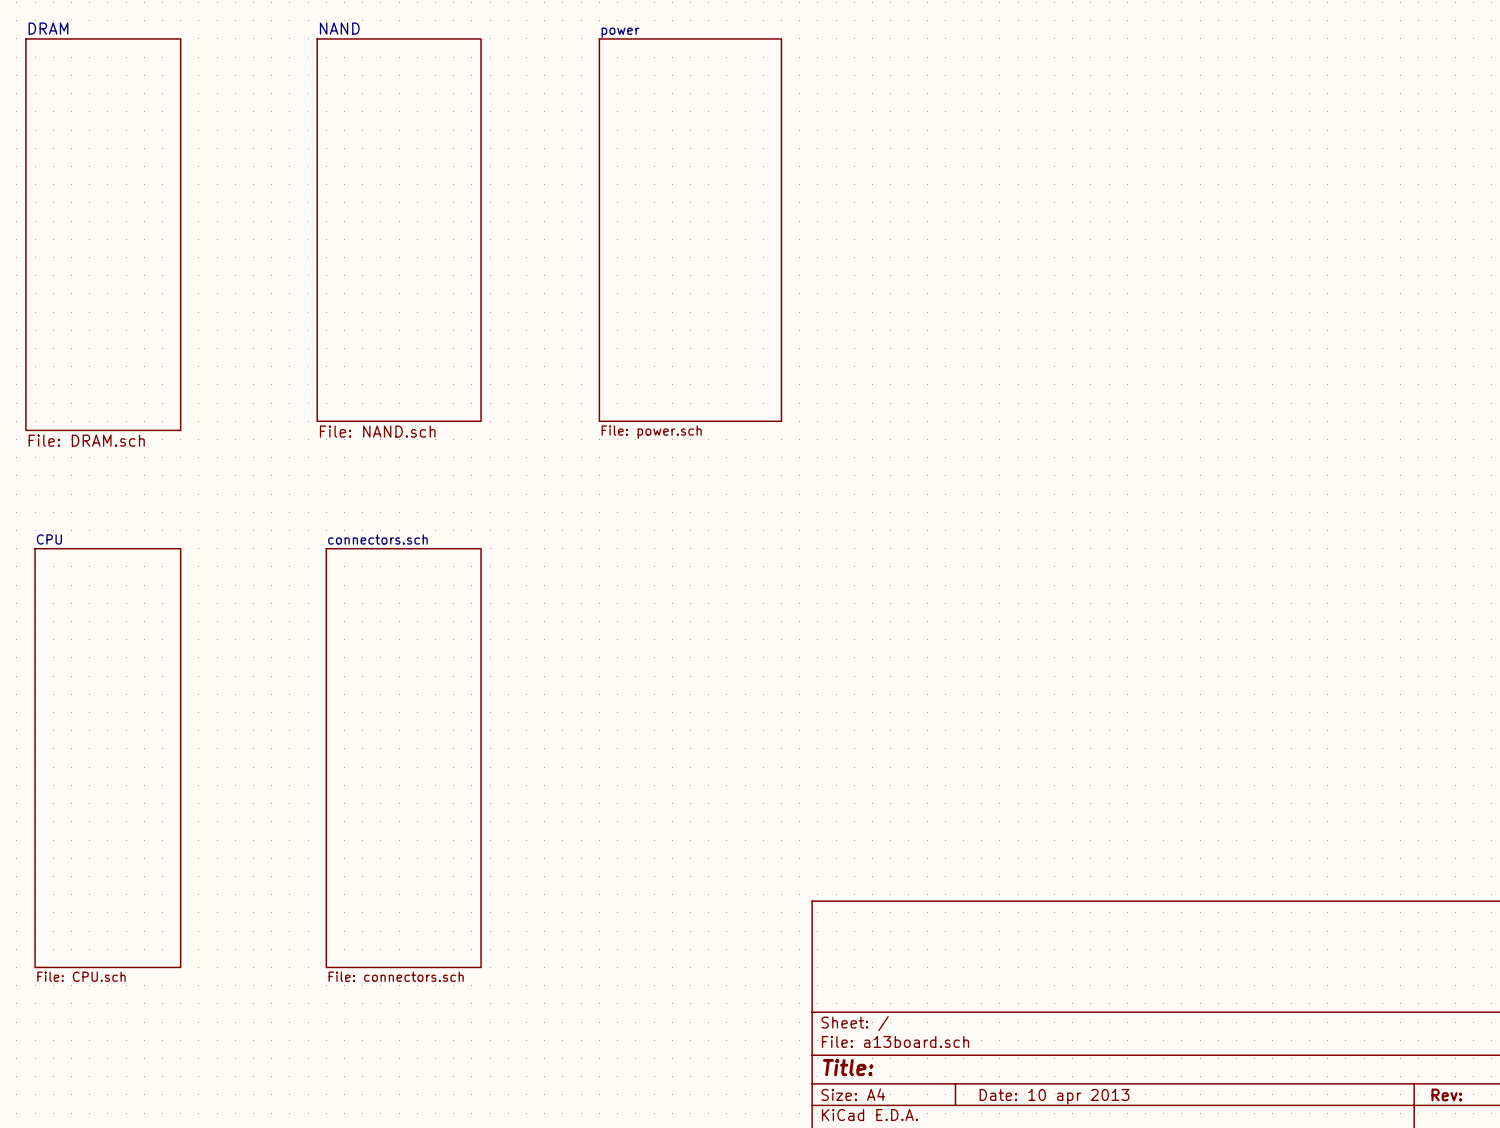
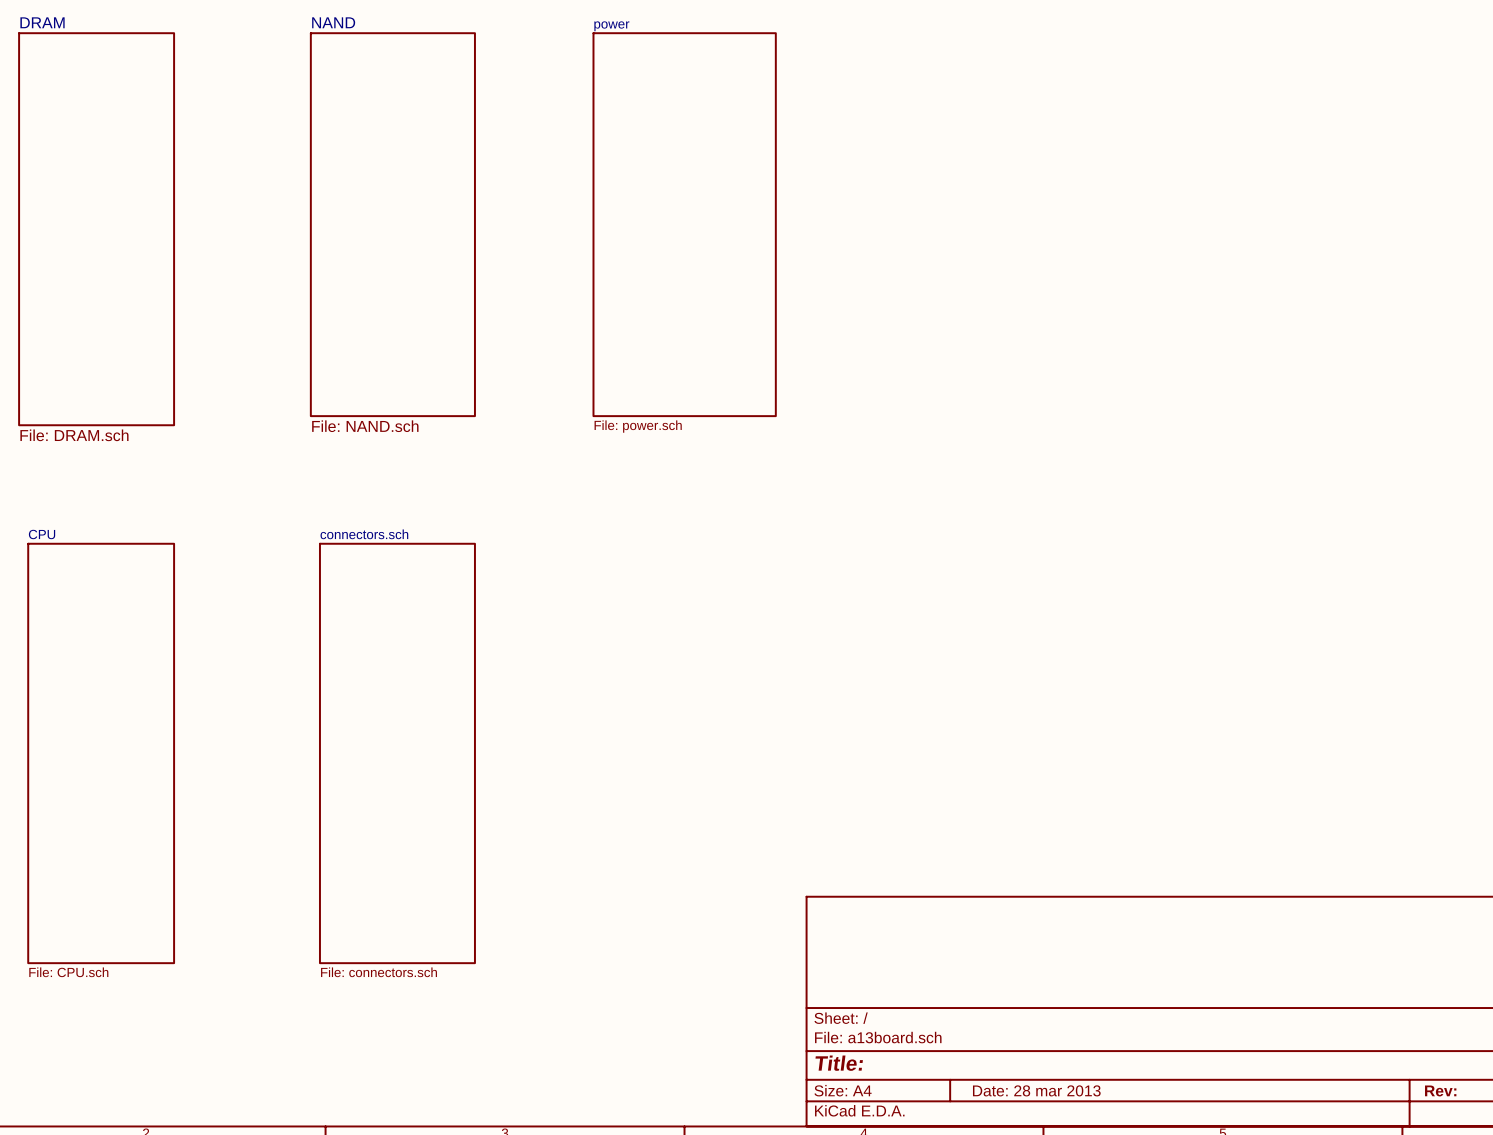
title block: Date: 10 apr 2013 (1054, 1096) -> Date: 28 mar 2013 (1036, 1090)

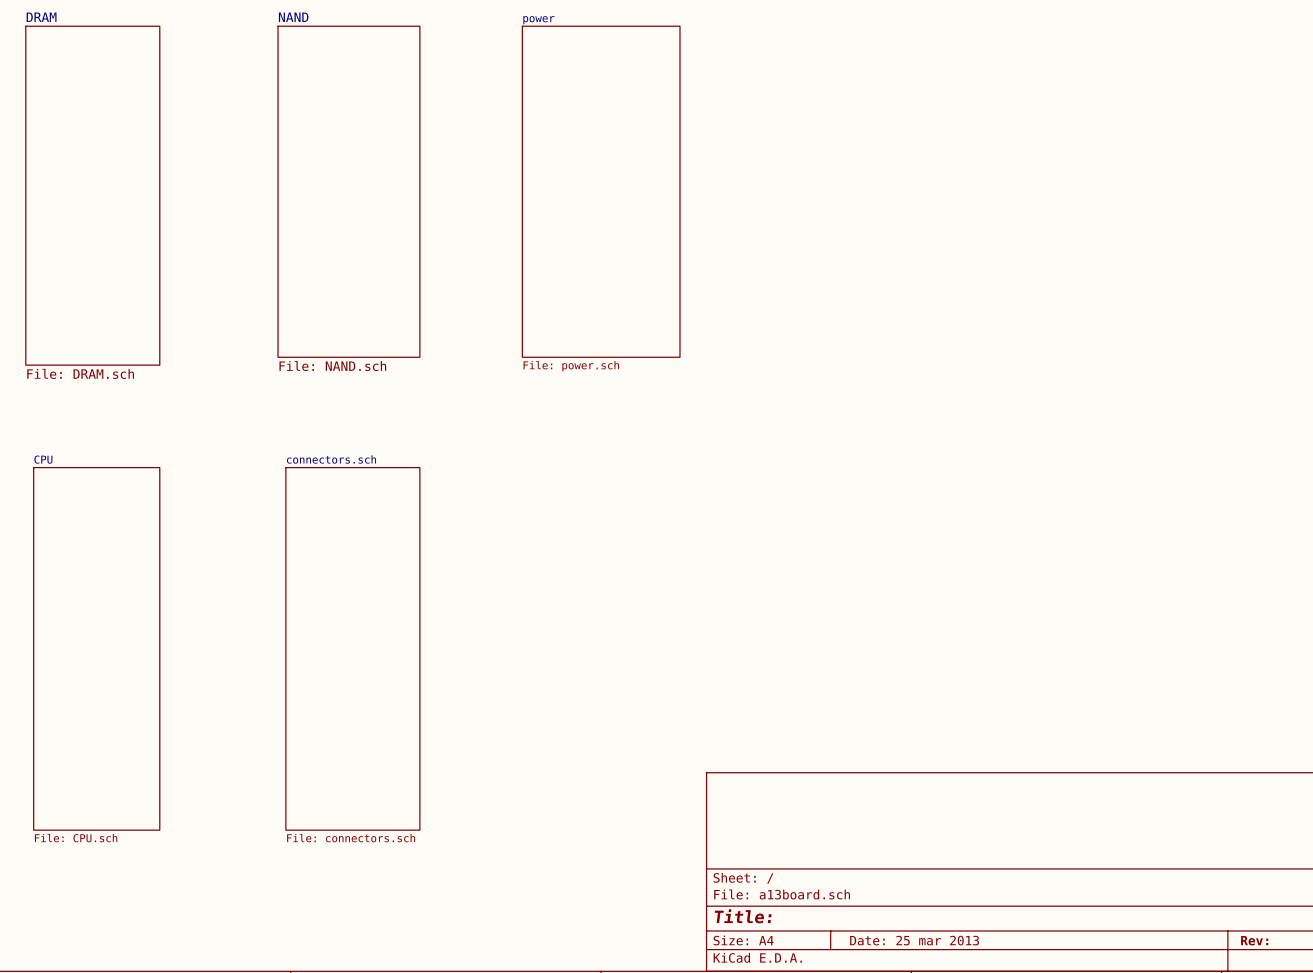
title block: Date: 28 mar 2013 (1036, 1090) -> Date: 25 mar 2013 (914, 940)

